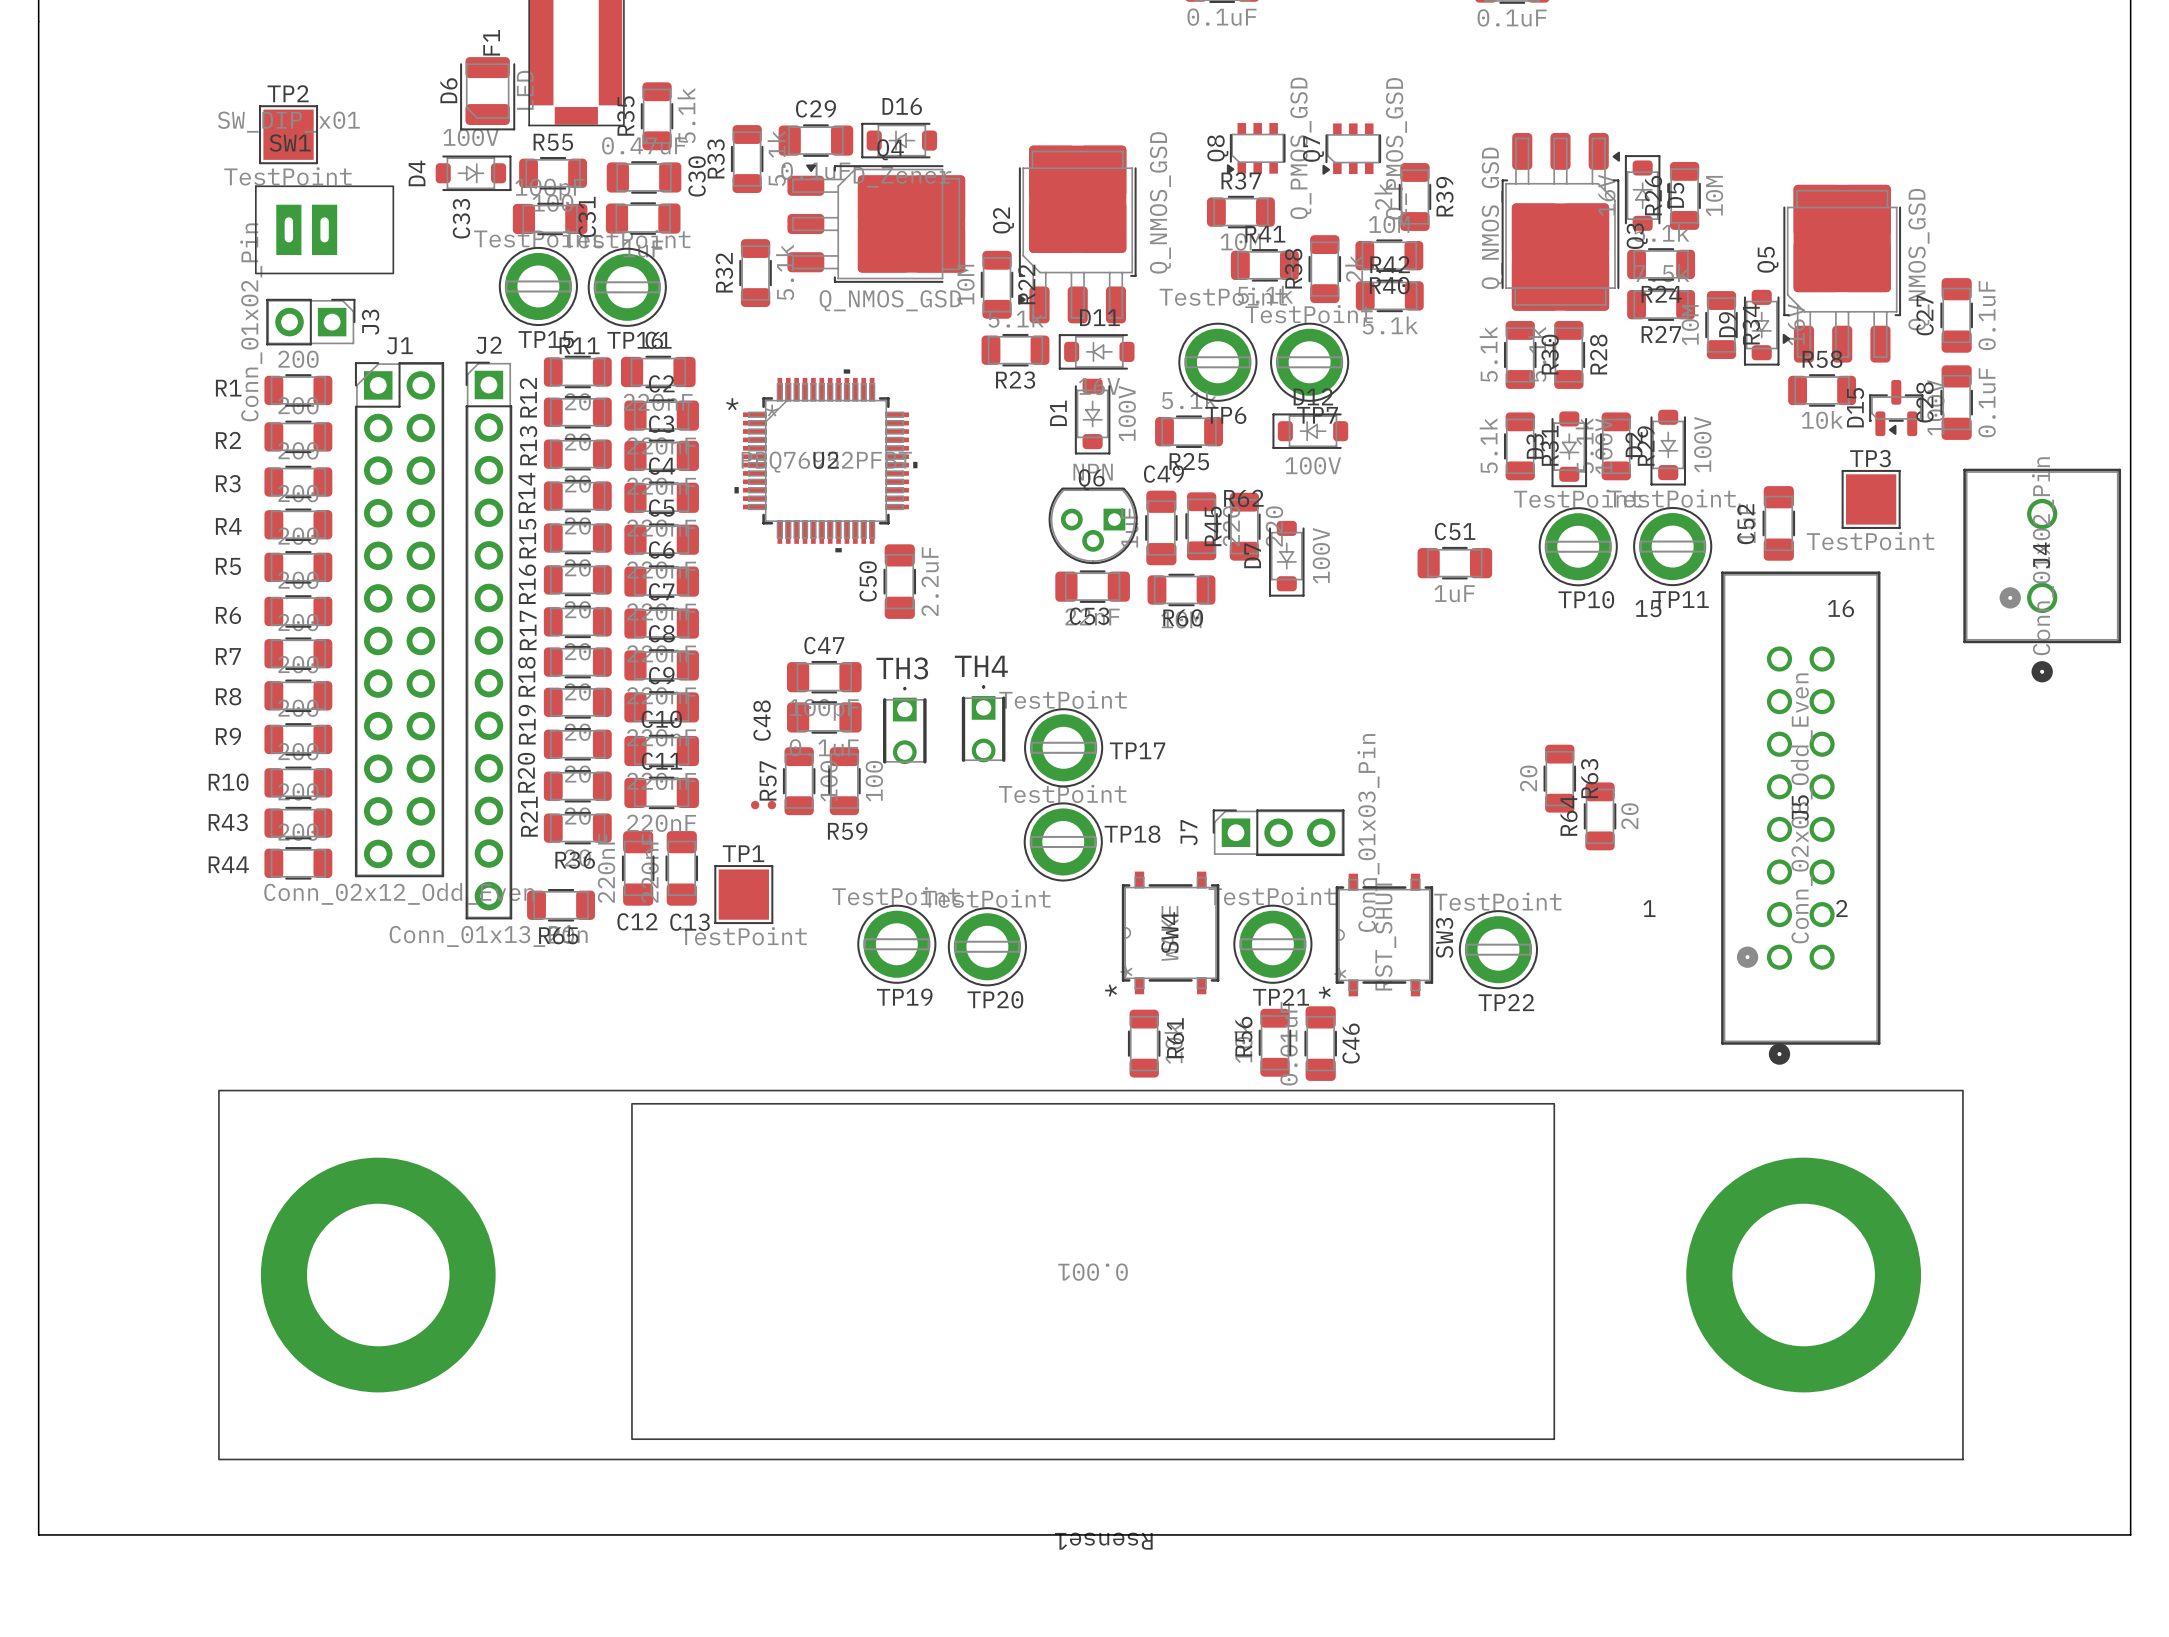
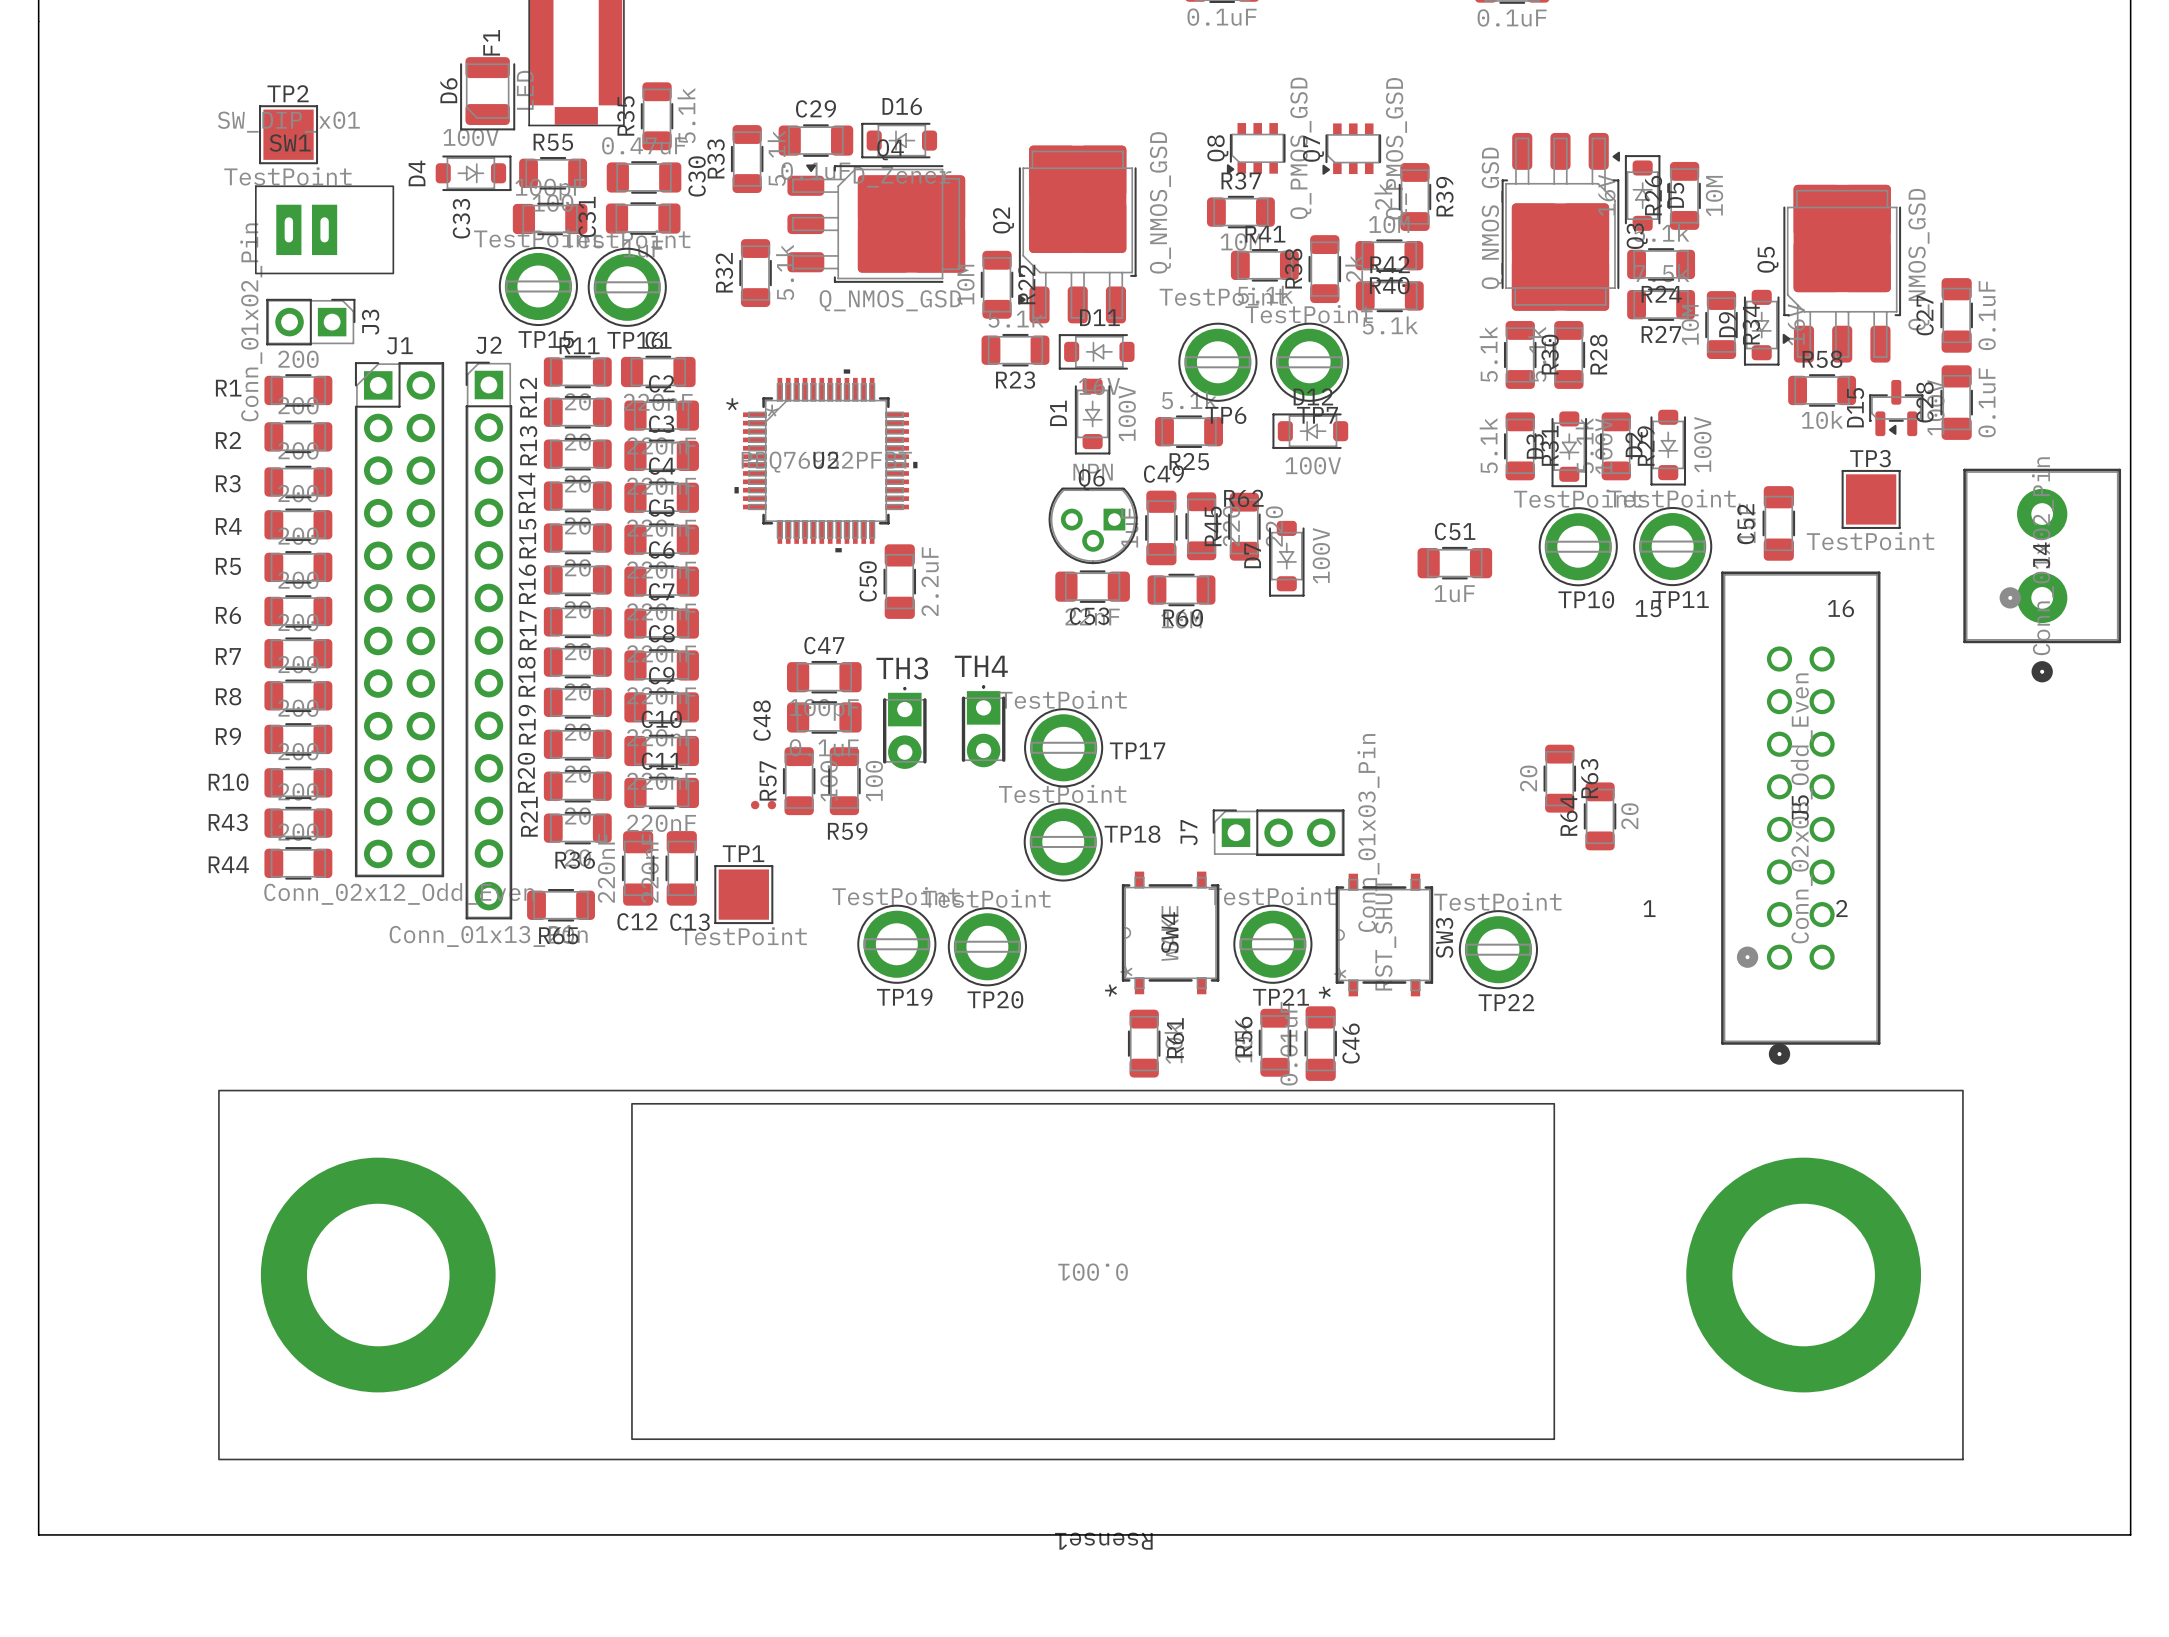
J4 footprint: [1963, 468, 2122, 683] -> [1963, 468, 2122, 683]
TH4 footprint: [961, 685, 1006, 763] -> [961, 685, 1006, 768]
TH3 footprint: [883, 686, 927, 765] -> [883, 686, 927, 769]

